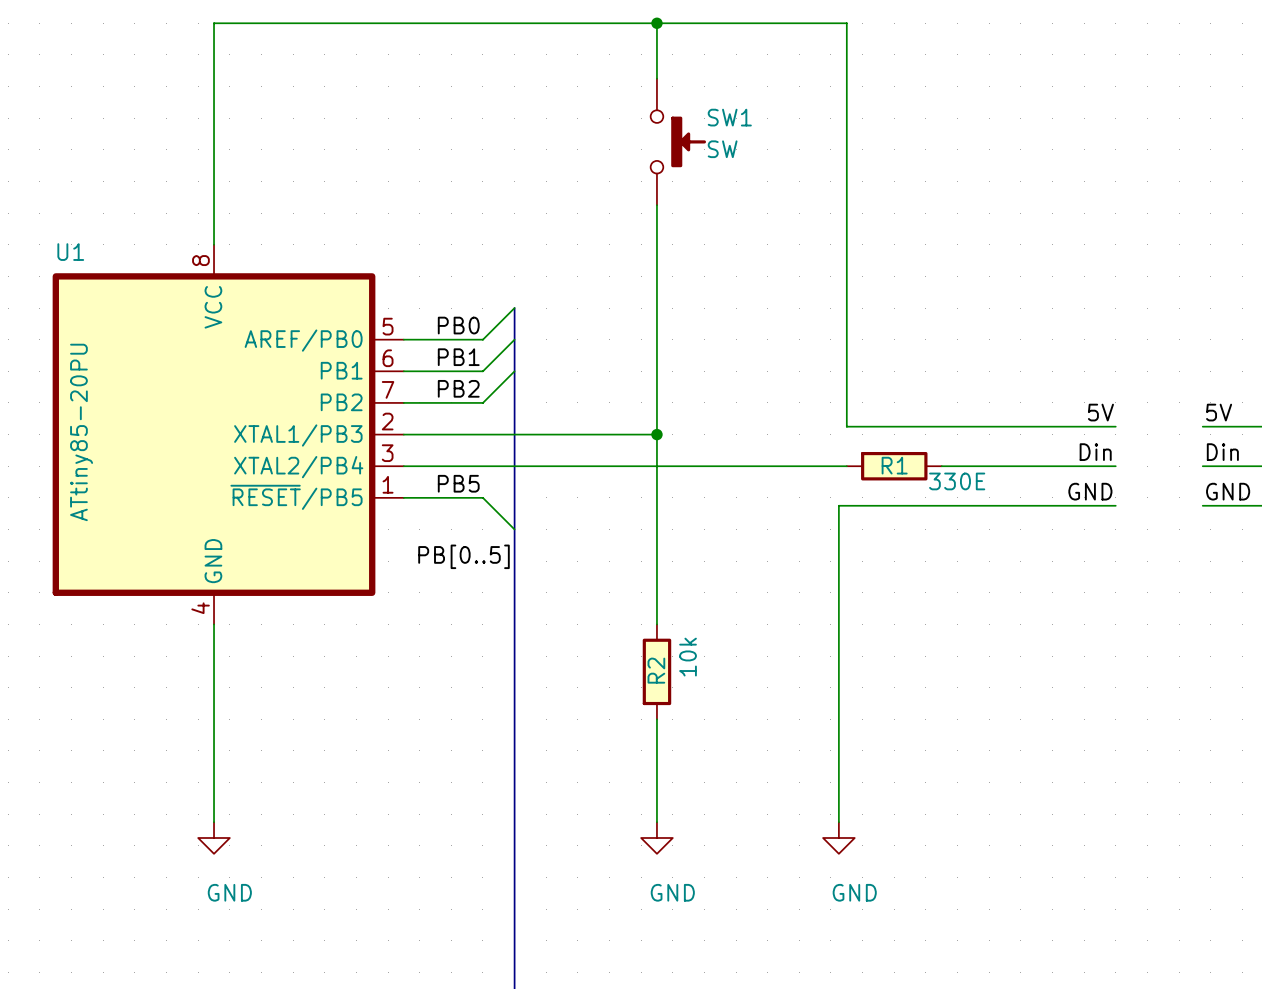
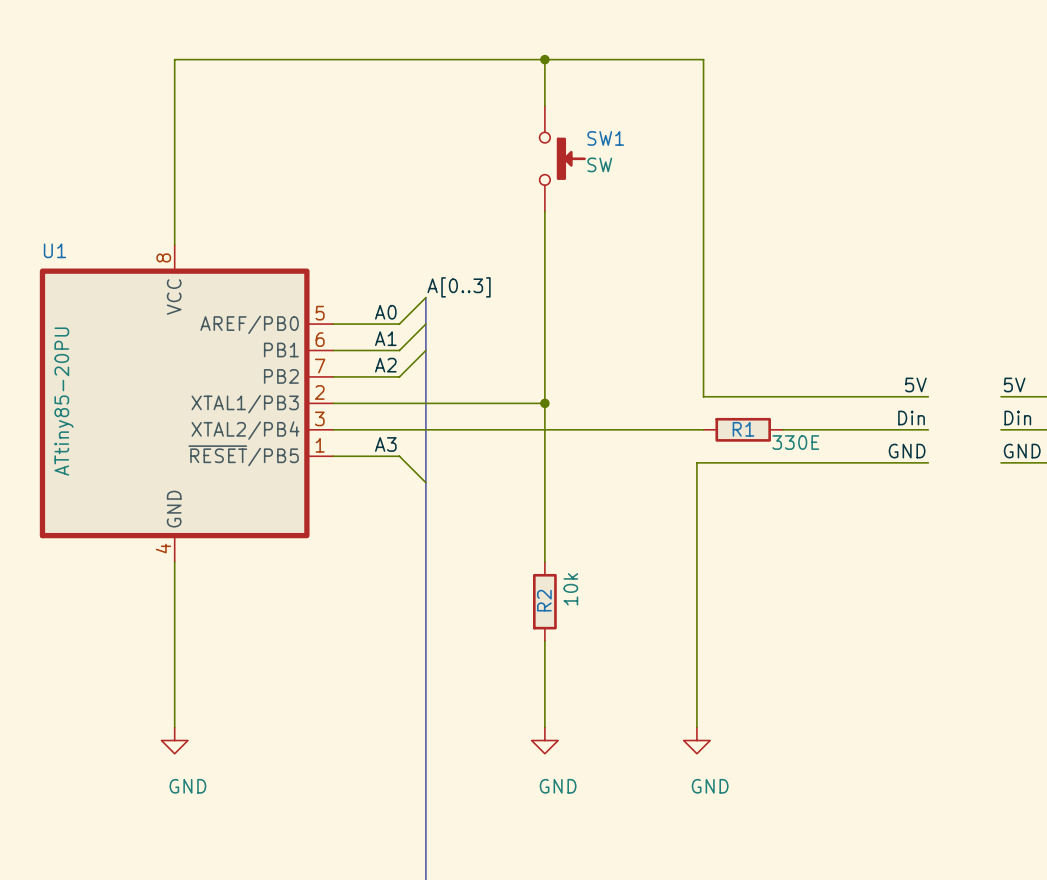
label: none -> A[0..3] (459, 287)
label: PB0 (458, 325) -> A0 (385, 312)
label: PB1 (458, 357) -> A1 (385, 338)
label: PB2 (458, 388) -> A2 (385, 365)
label: PB5 (458, 483) -> A3 (385, 444)
label: PB[0..5] (464, 556) -> none

